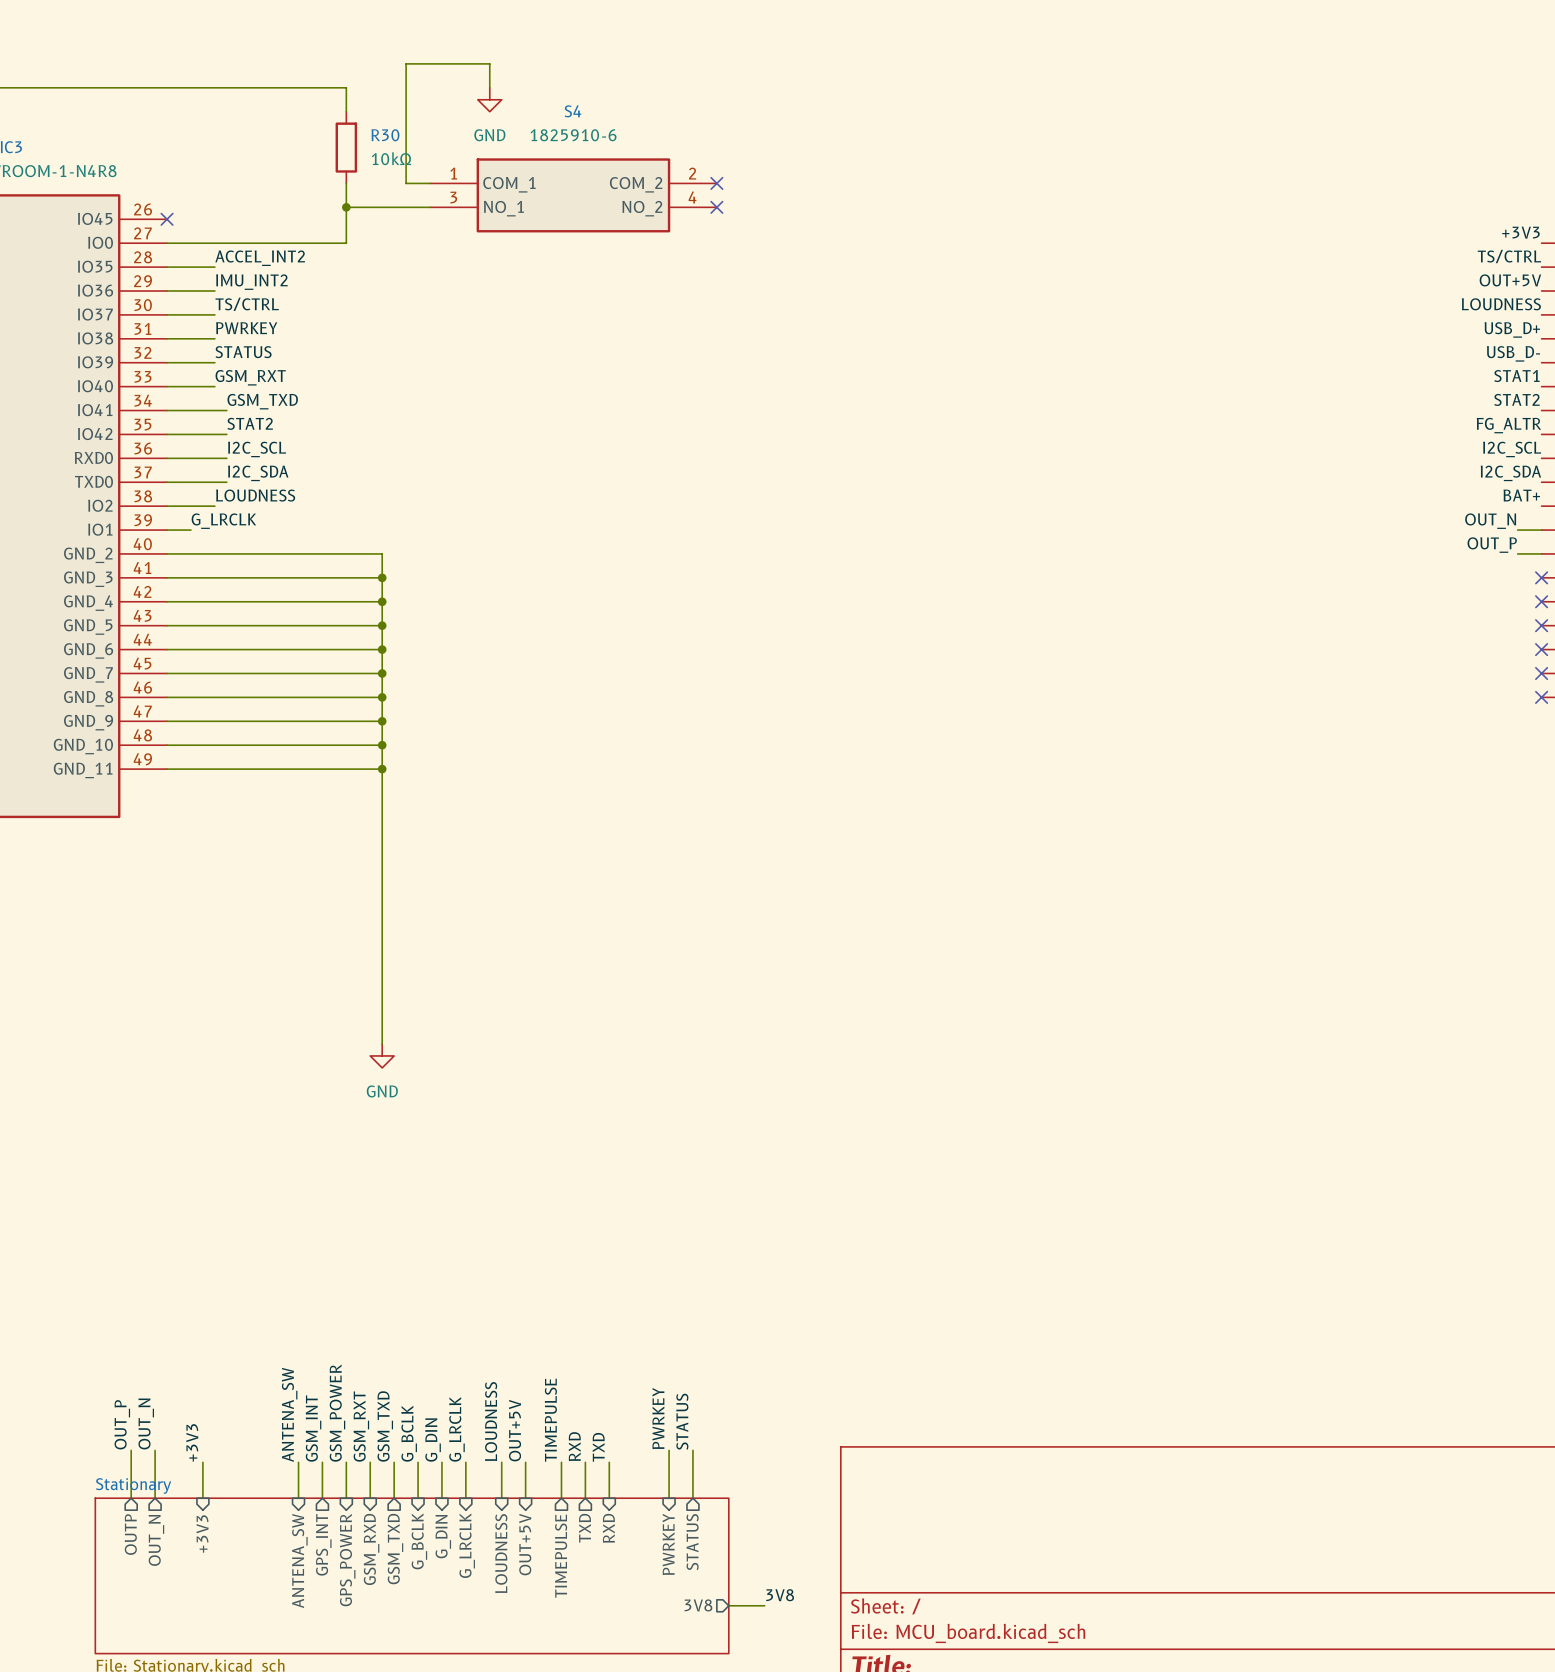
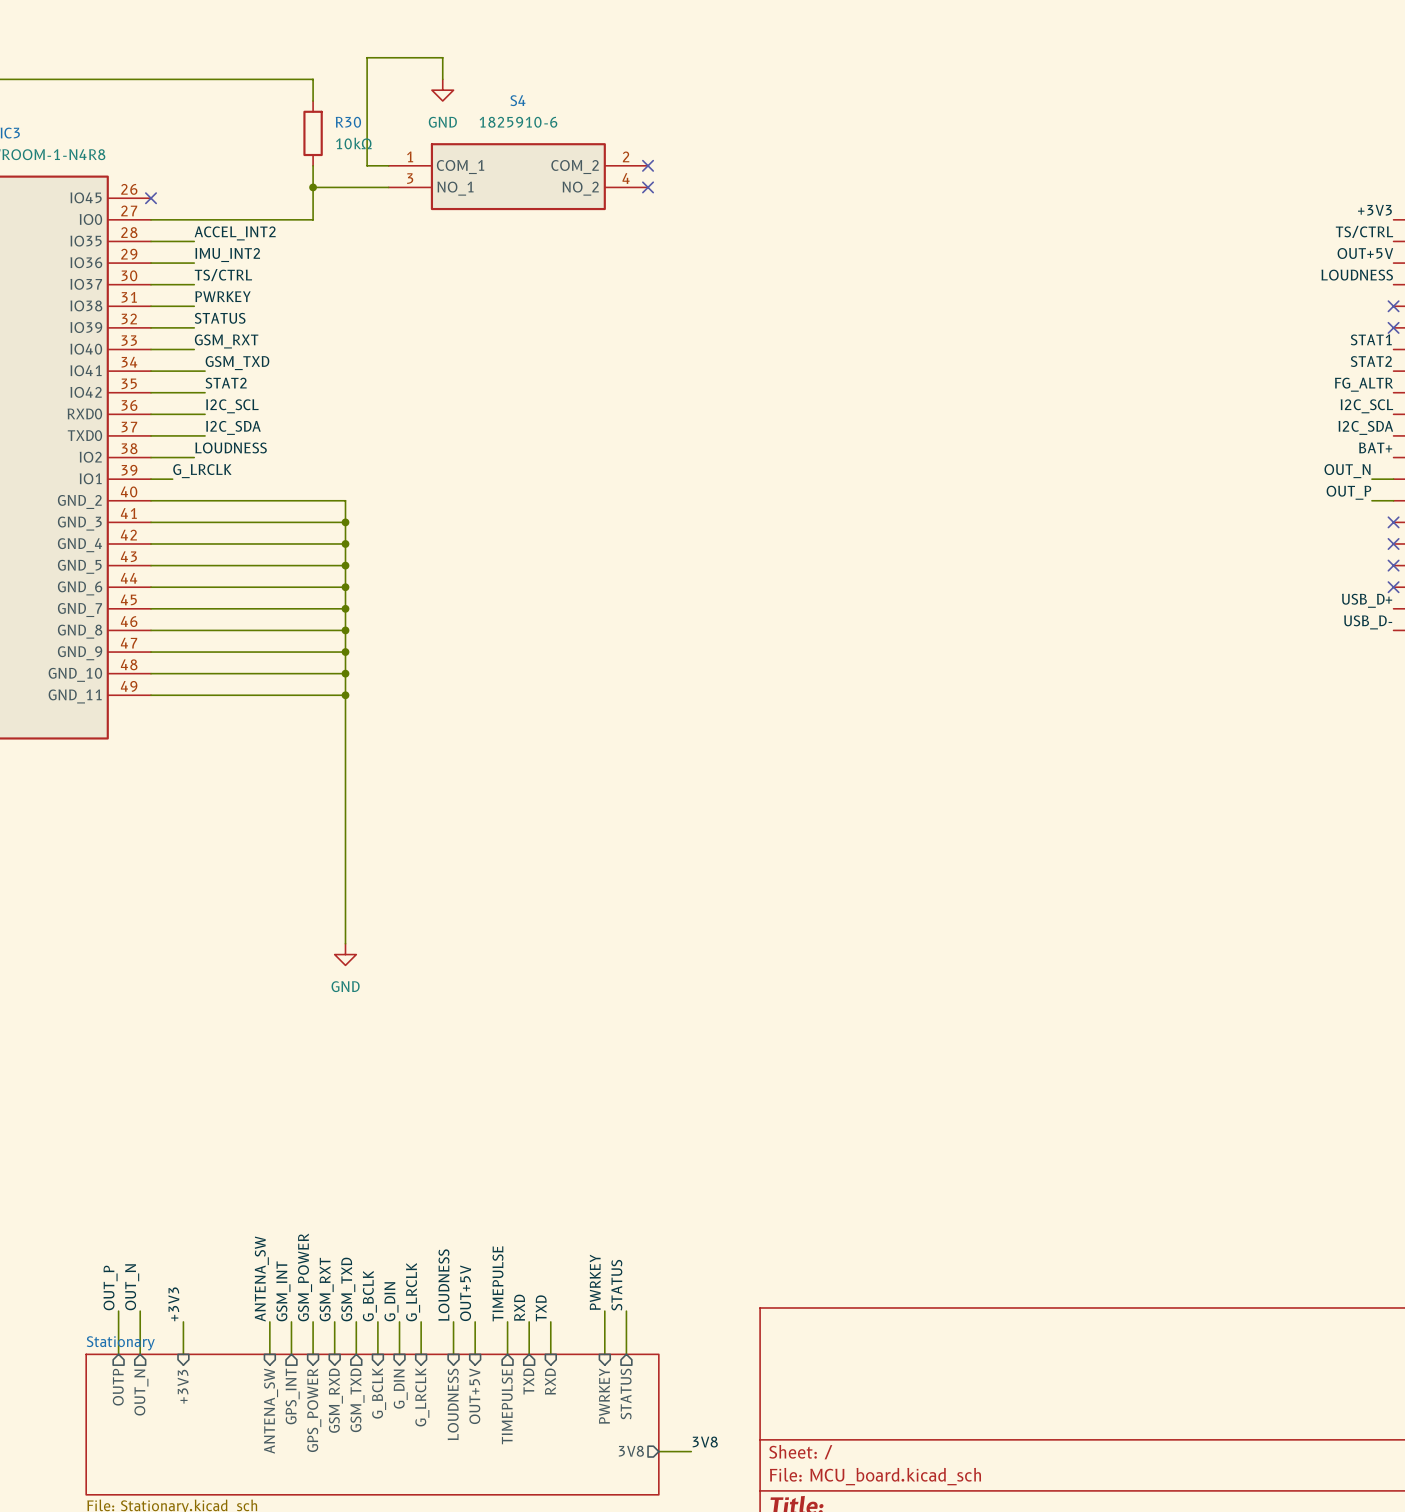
label: USB_D+ (1512, 329) -> none
no-connect mark: none -> (1393, 306)
label: USB_D- (1513, 353) -> none
no-connect mark: none -> (1393, 327)
label: none -> USB_D+ (1367, 600)
no-connect mark: (1541, 673) -> none
label: none -> USB_D- (1368, 622)
no-connect mark: (1541, 697) -> none

